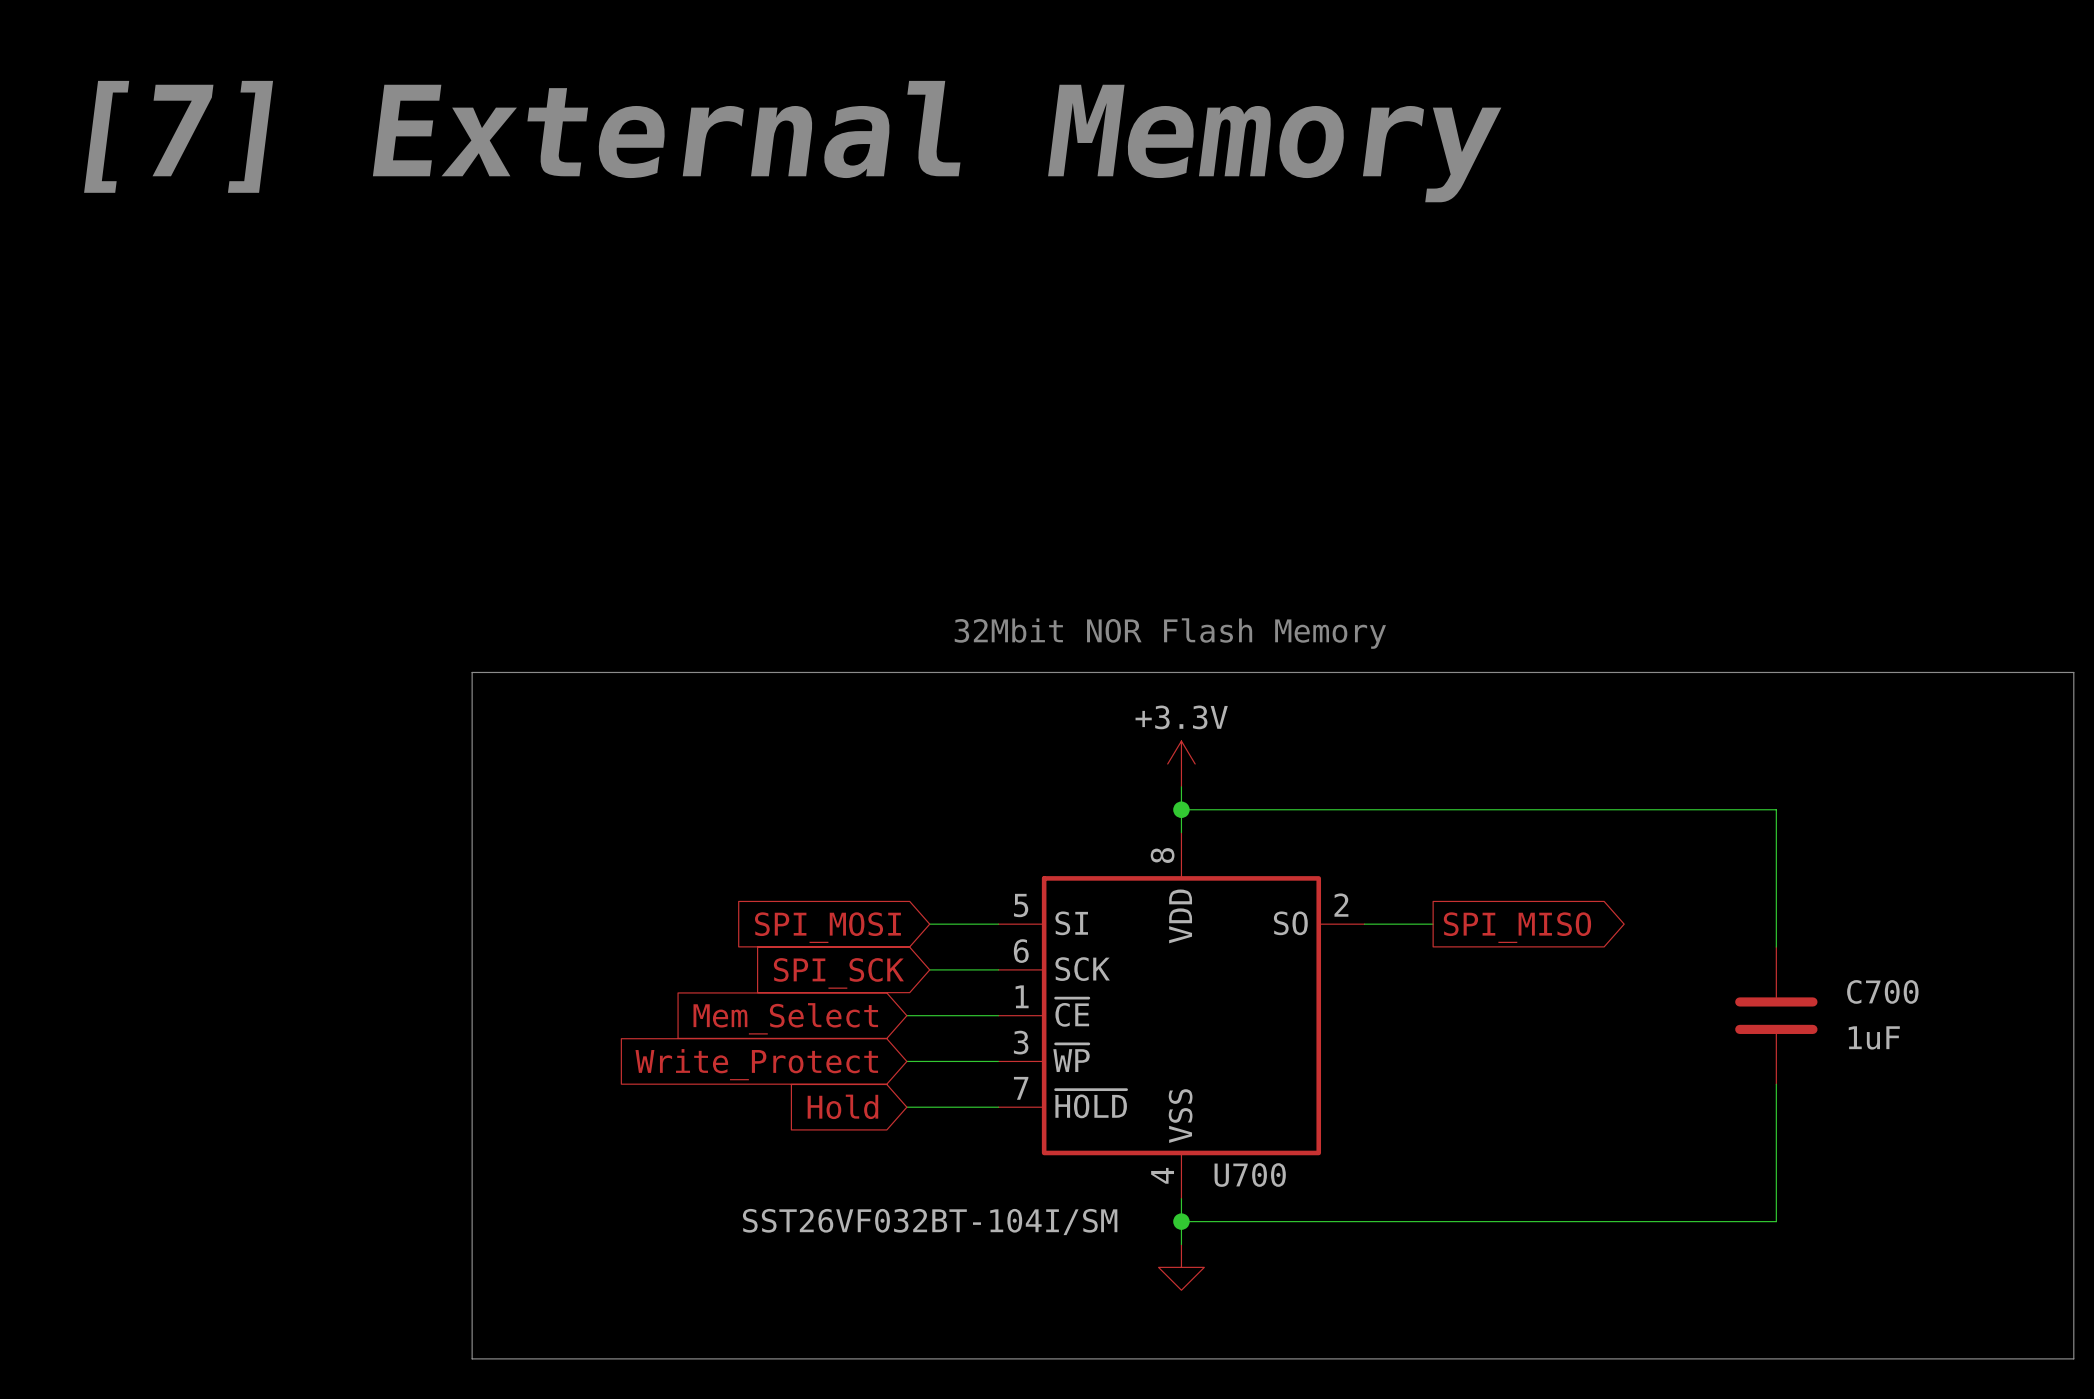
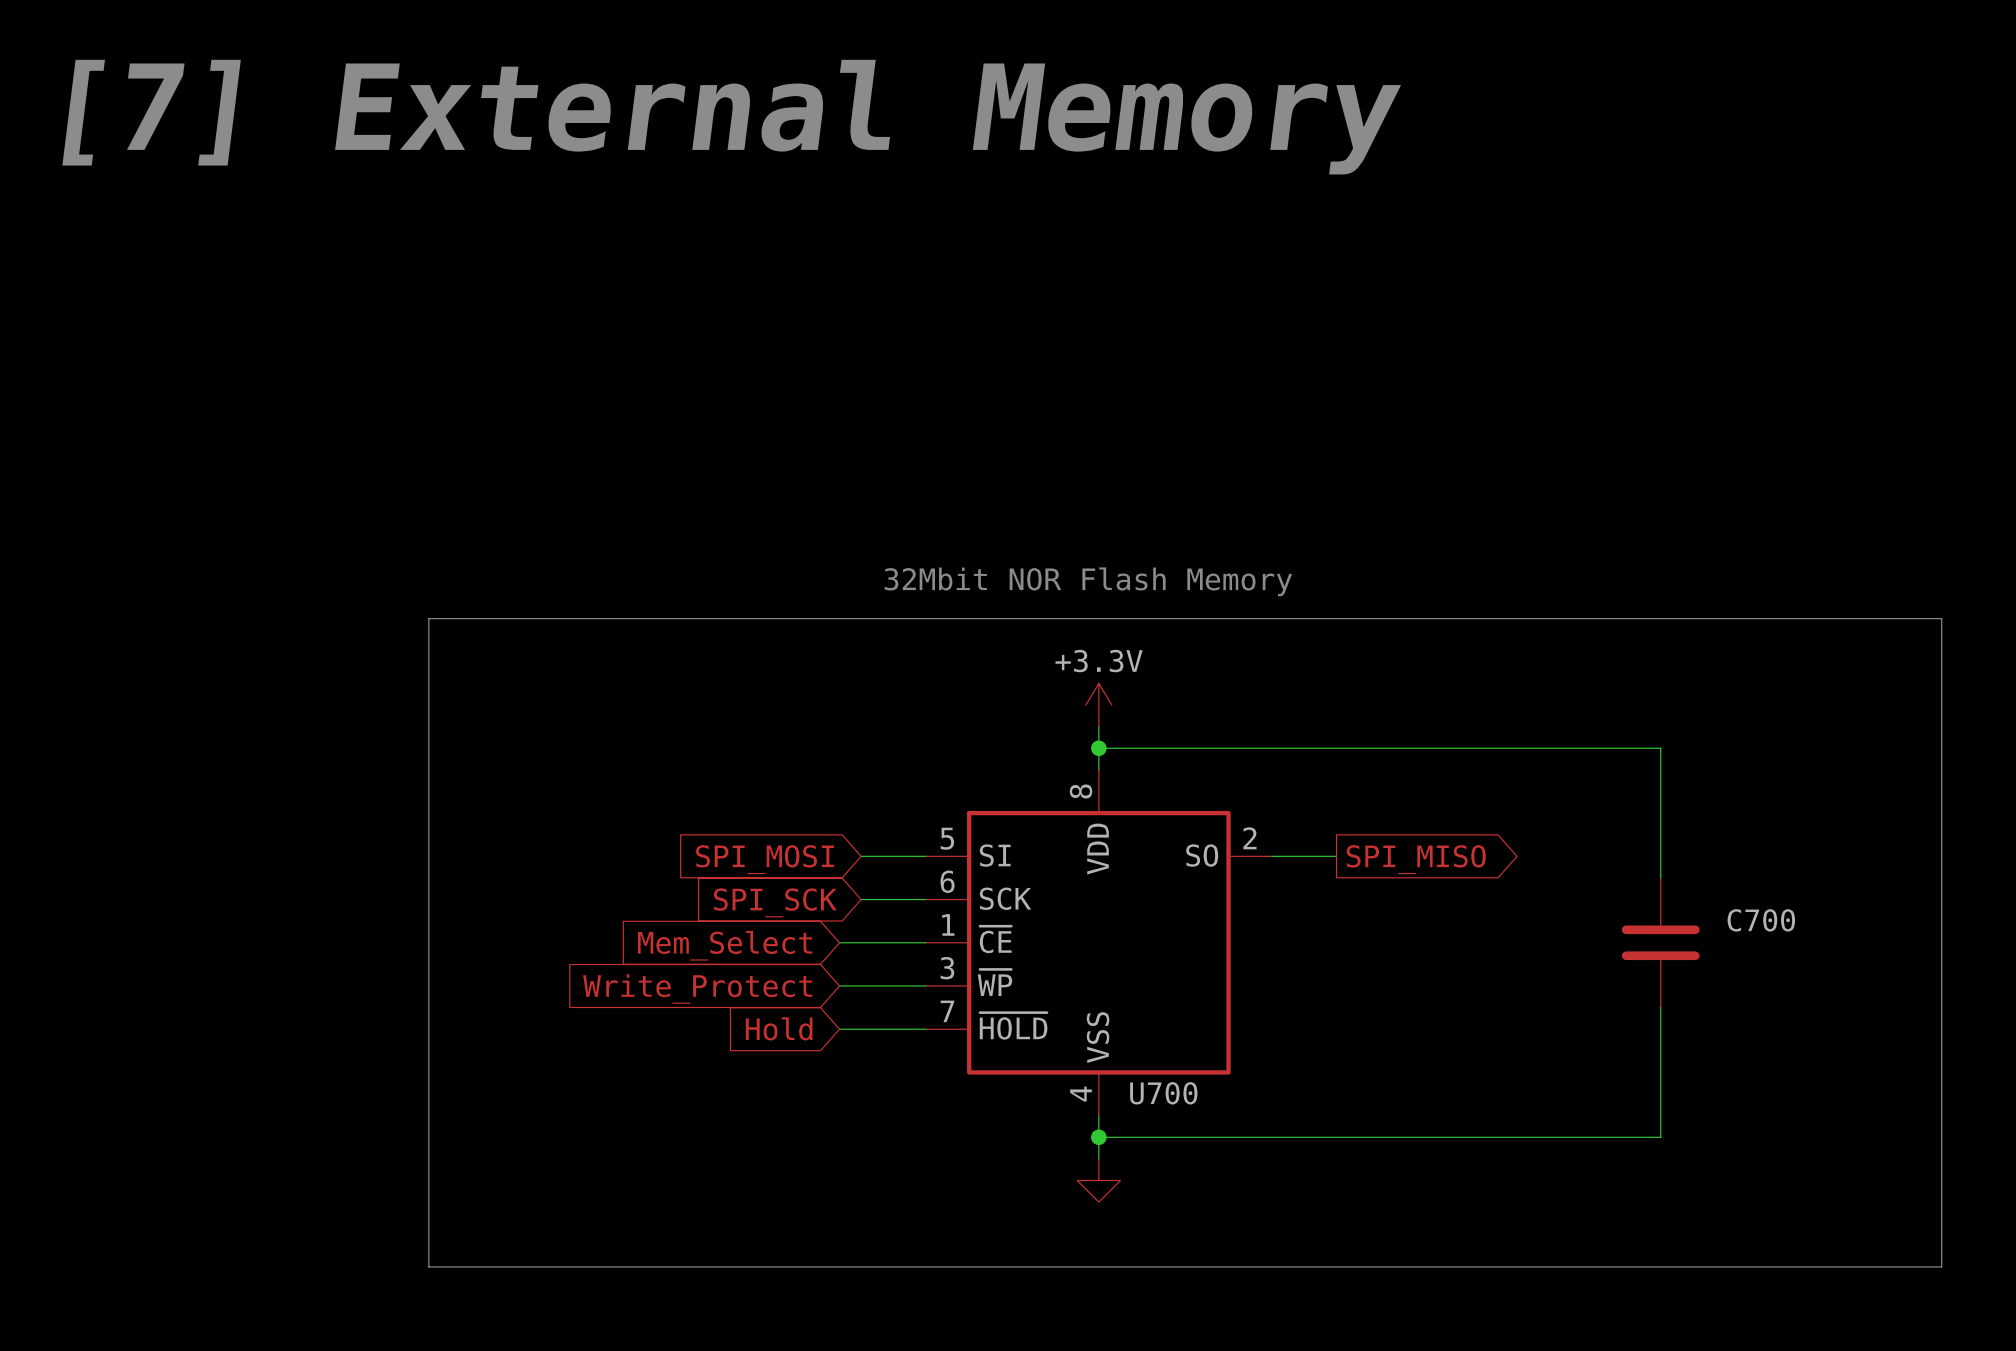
C700 value: 1uF (1874, 1037) -> none
U700 value: SST26VF032BT-104I/SM (930, 1222) -> none

